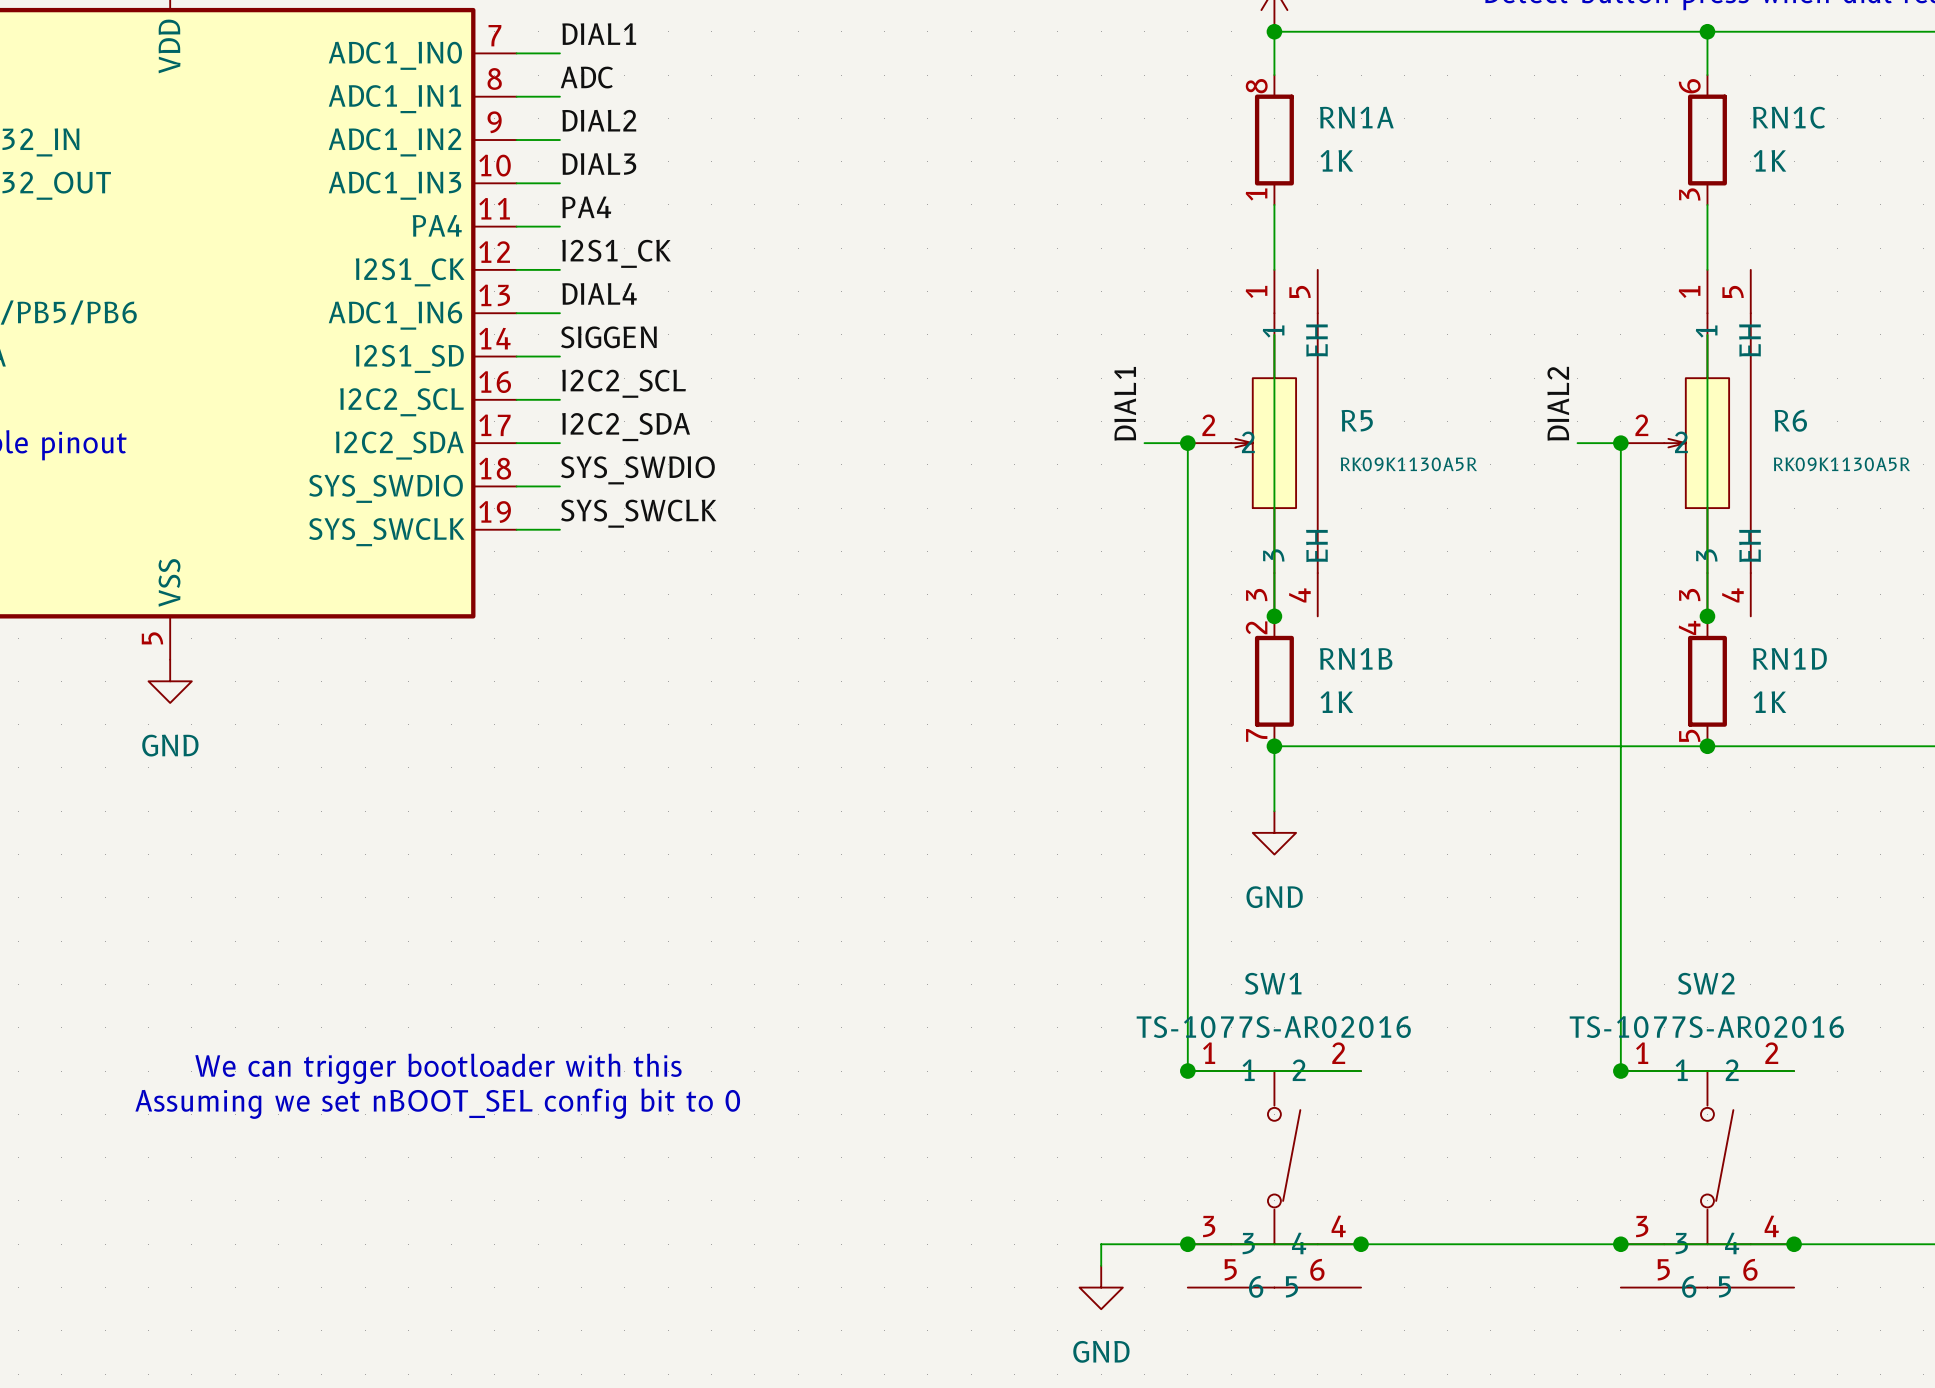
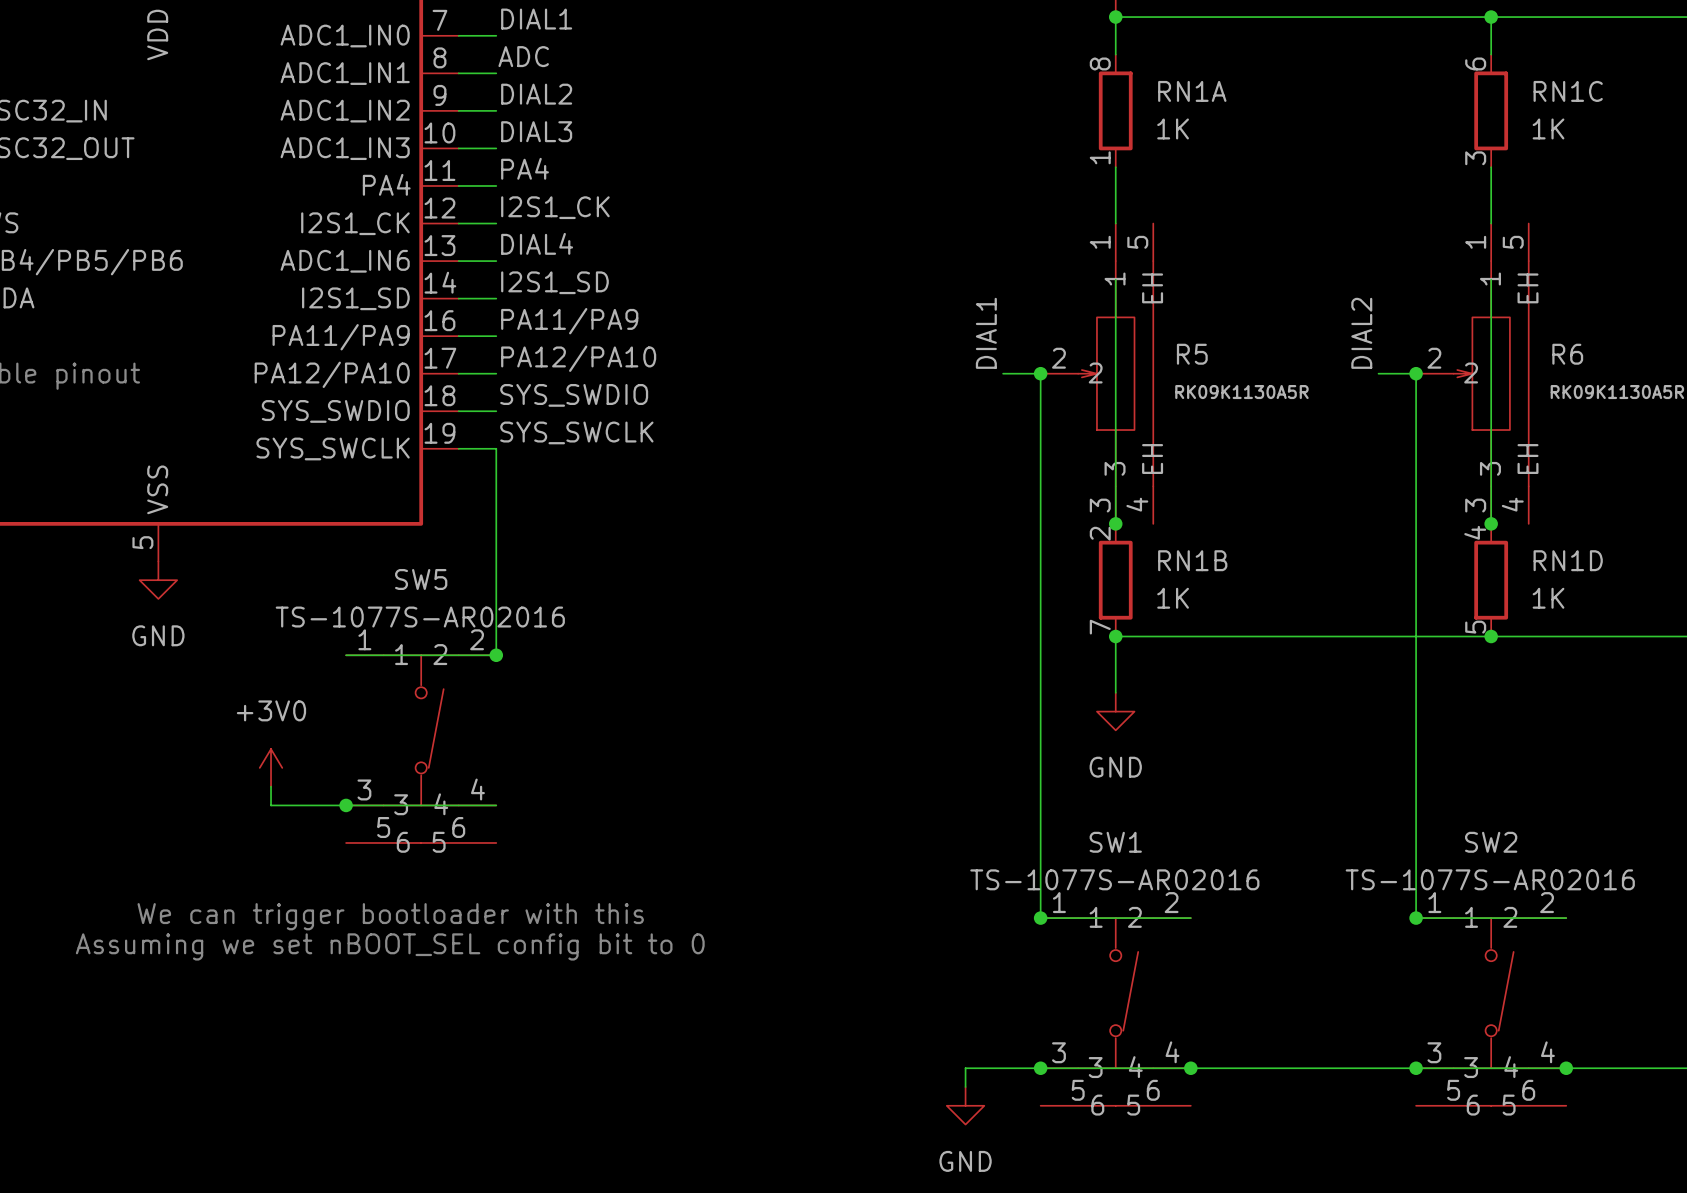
label: SIGGEN (608, 337) -> I2S1_SD (554, 282)
label: I2C2_SCL (624, 383) -> PA11/PA9 (569, 321)
part pin name: I2C2_SCL (401, 402) -> PA11/PA9 (341, 337)
label: I2C2_SDA (626, 427) -> PA12/PA10 (578, 358)
part pin name: I2C2_SDA (399, 445) -> PA12/PA10 (332, 374)
wire: none -> (496, 448) (496, 655) (346, 655)
junction: none -> (496, 655)
SW5: none -> TS-1077S-AR02016 (421, 749)
power symbol: none -> +3V0 (271, 767)
wire: none -> (271, 786) (271, 805) (496, 805)
junction: none -> (346, 805)

